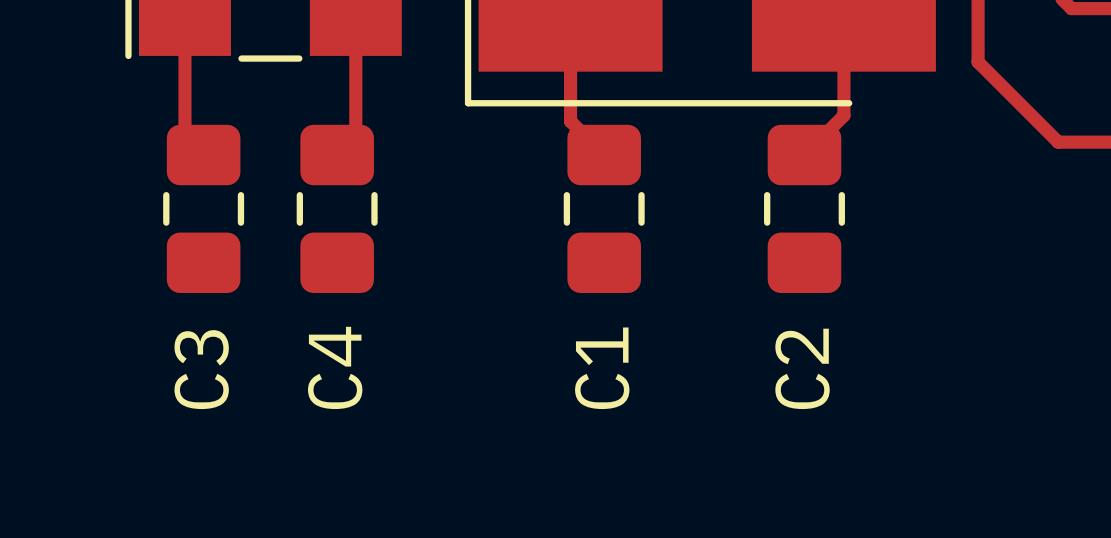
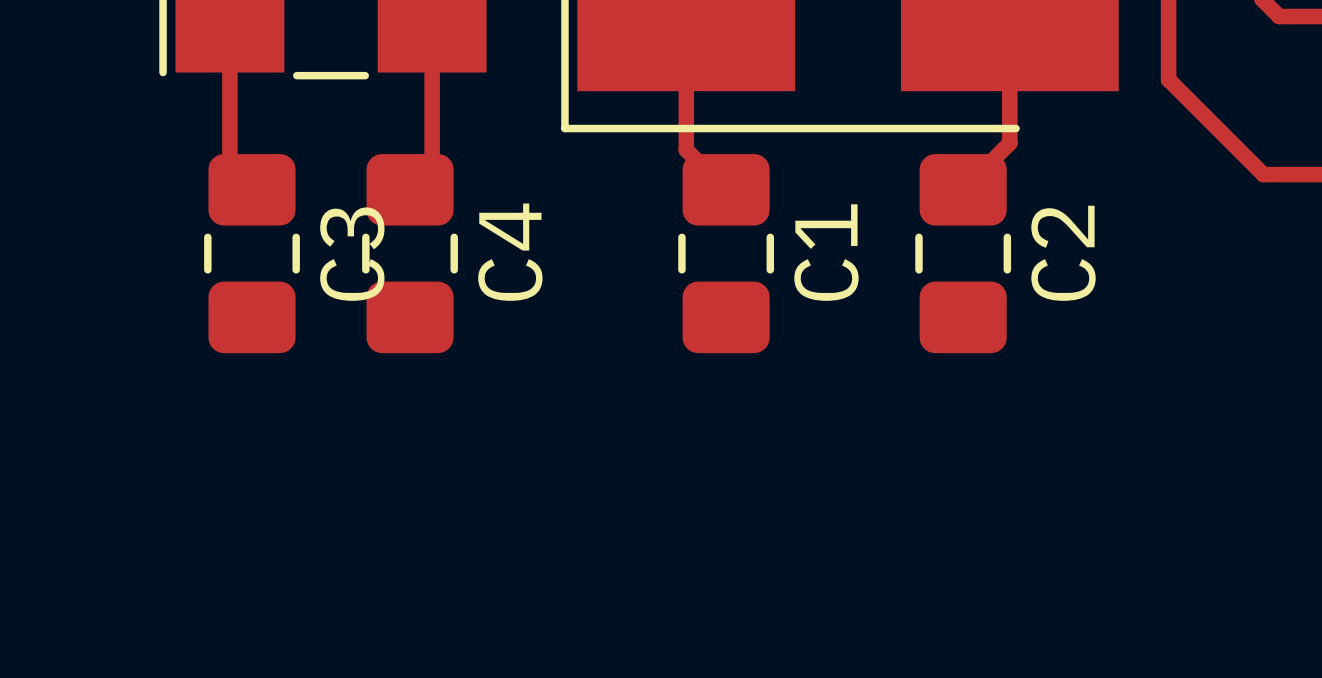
C4 name position: C4 (335, 367) -> C4 (510, 252)
C1 name position: C1 (602, 368) -> C1 (826, 252)
C2 name position: C2 (802, 368) -> C2 (1063, 253)
C3 name position: C3 (201, 369) -> C3 (352, 254)

